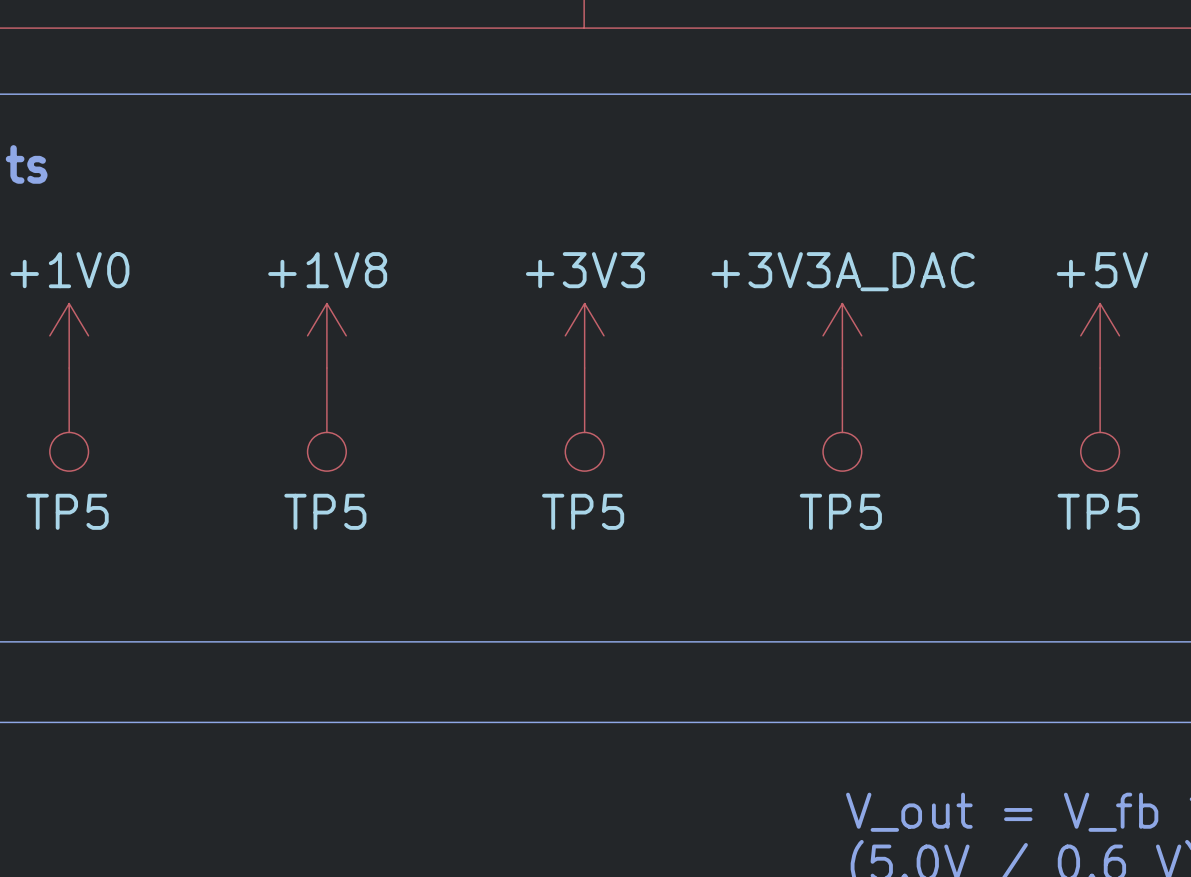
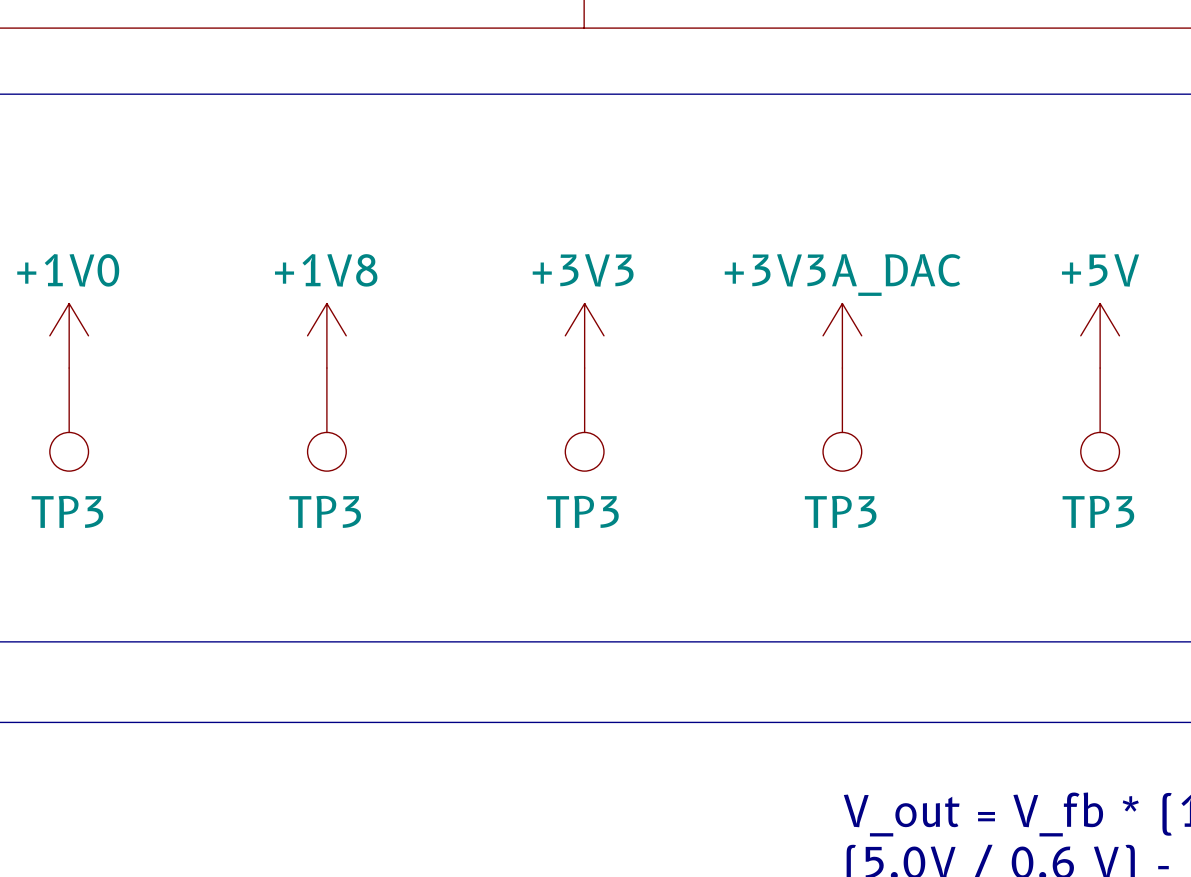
TP5 name: TP5 (67, 511) -> TP3 (67, 511)
TP5 name: TP5 (325, 511) -> TP3 (325, 511)
TP5 name: TP5 (583, 511) -> TP3 (582, 511)
TP5 name: TP5 (840, 511) -> TP3 (840, 511)
TP5 name: TP5 (1098, 511) -> TP3 (1098, 511)

